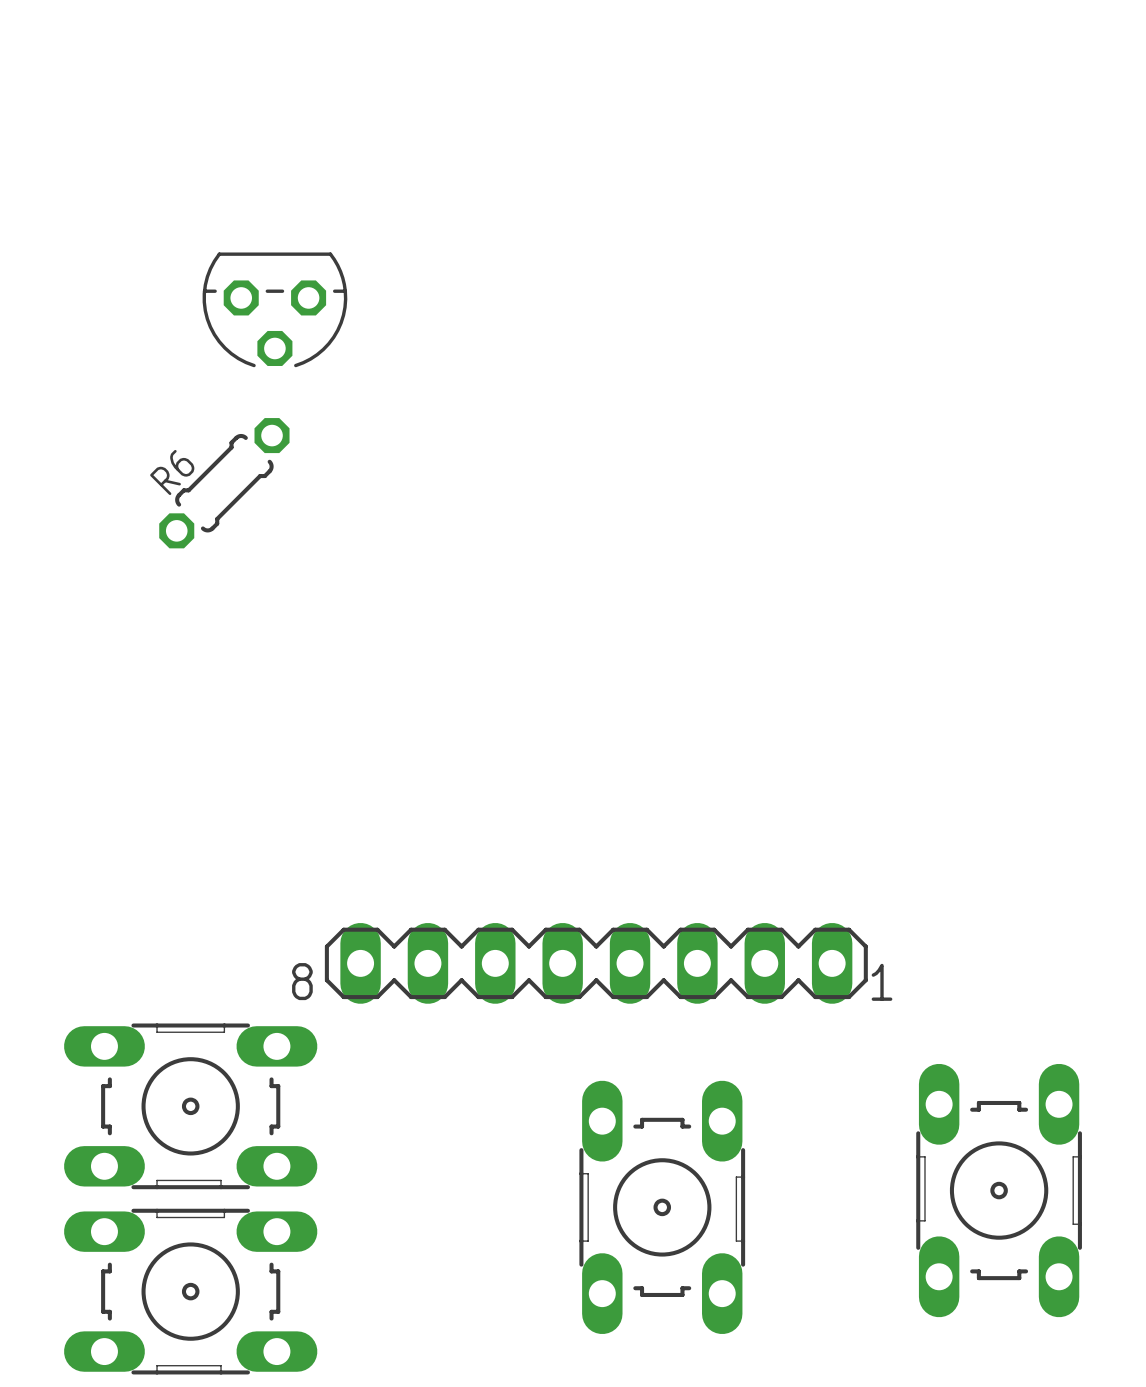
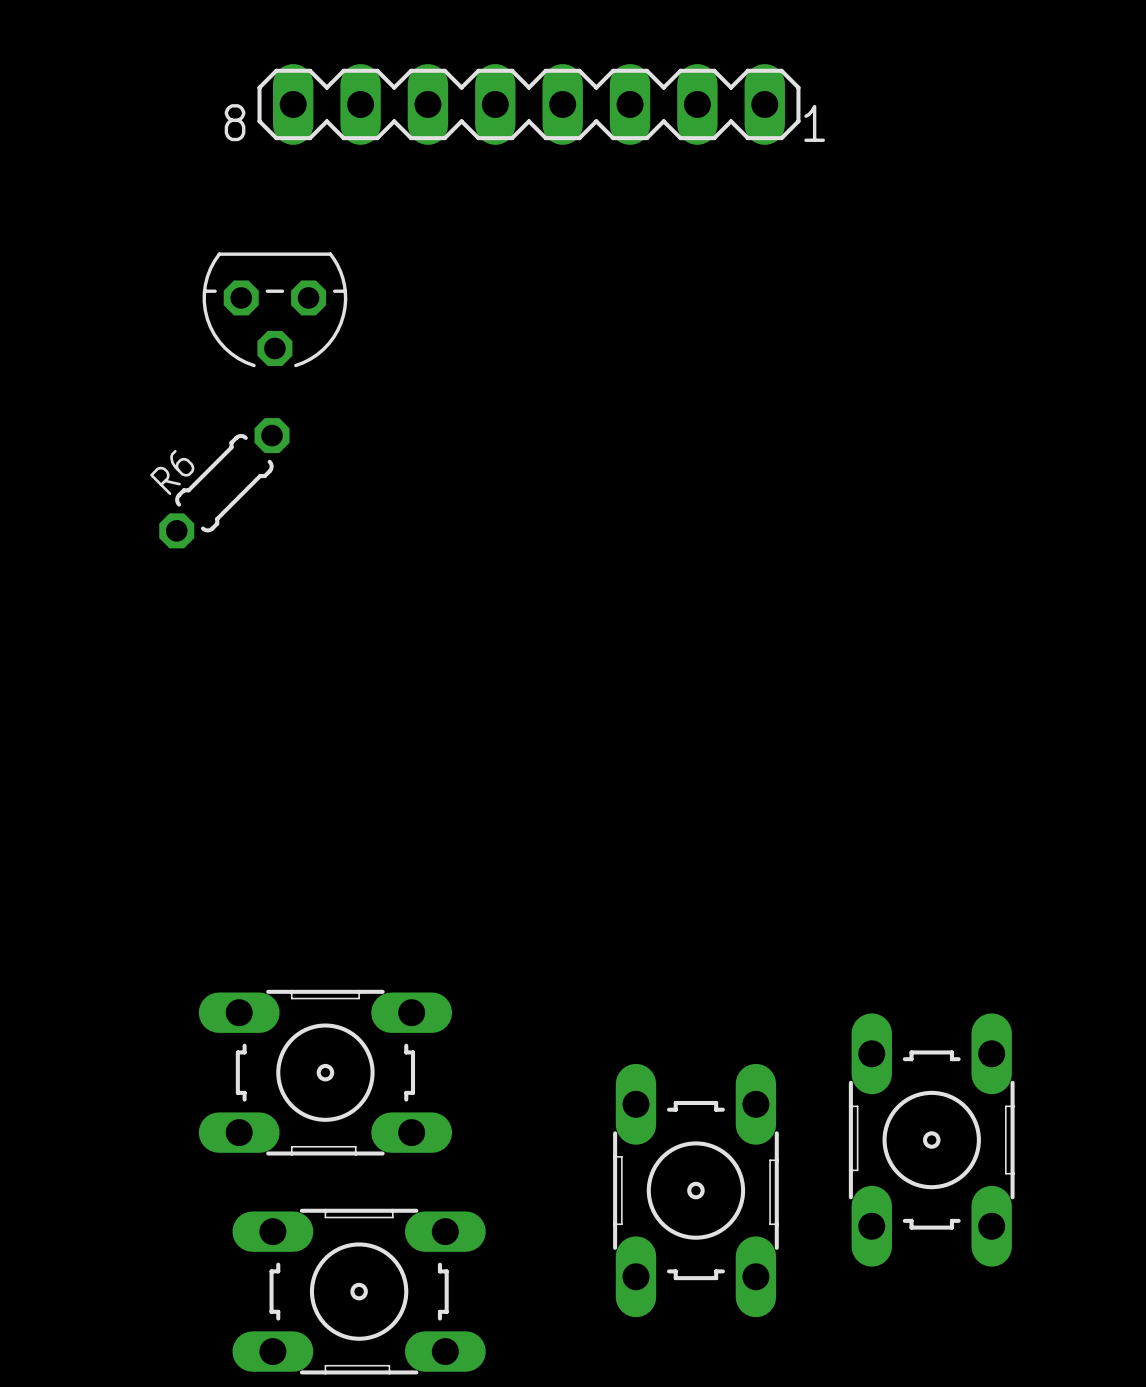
part: none -> (528, 104)
part: (596, 963) -> none
part: none -> (325, 1072)
part: (190, 1106) -> none
part position: (999, 1190) -> (931, 1140)
part position: (662, 1207) -> (695, 1190)
part: (190, 1291) -> none
part: none -> (359, 1291)

